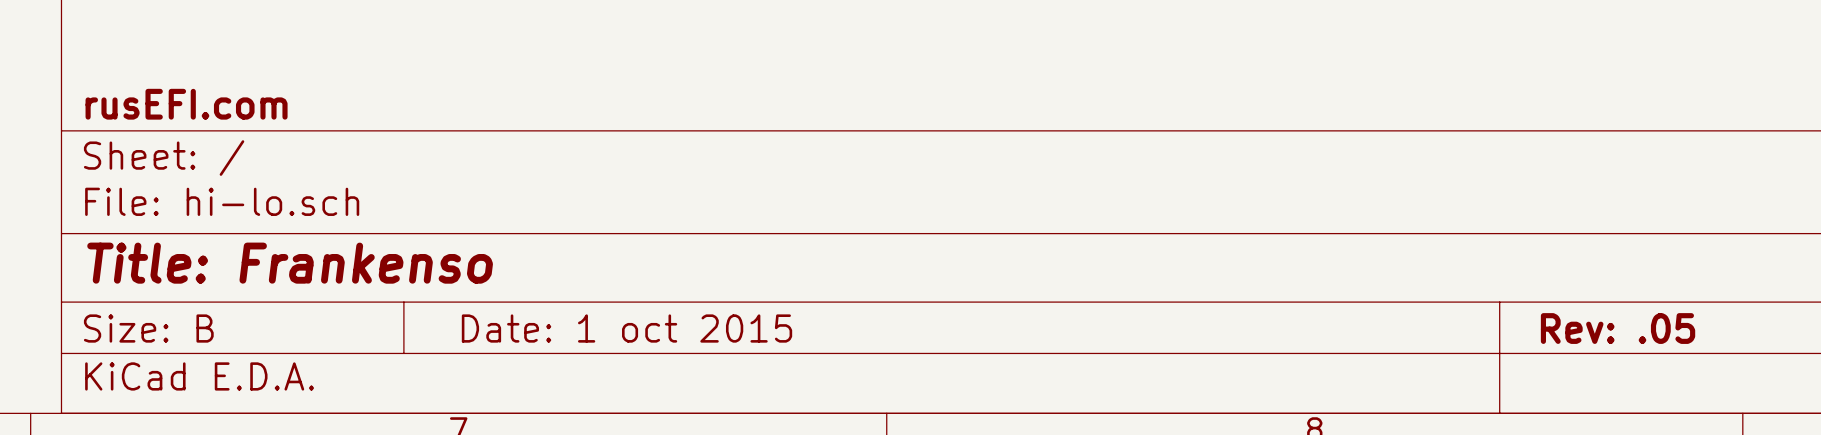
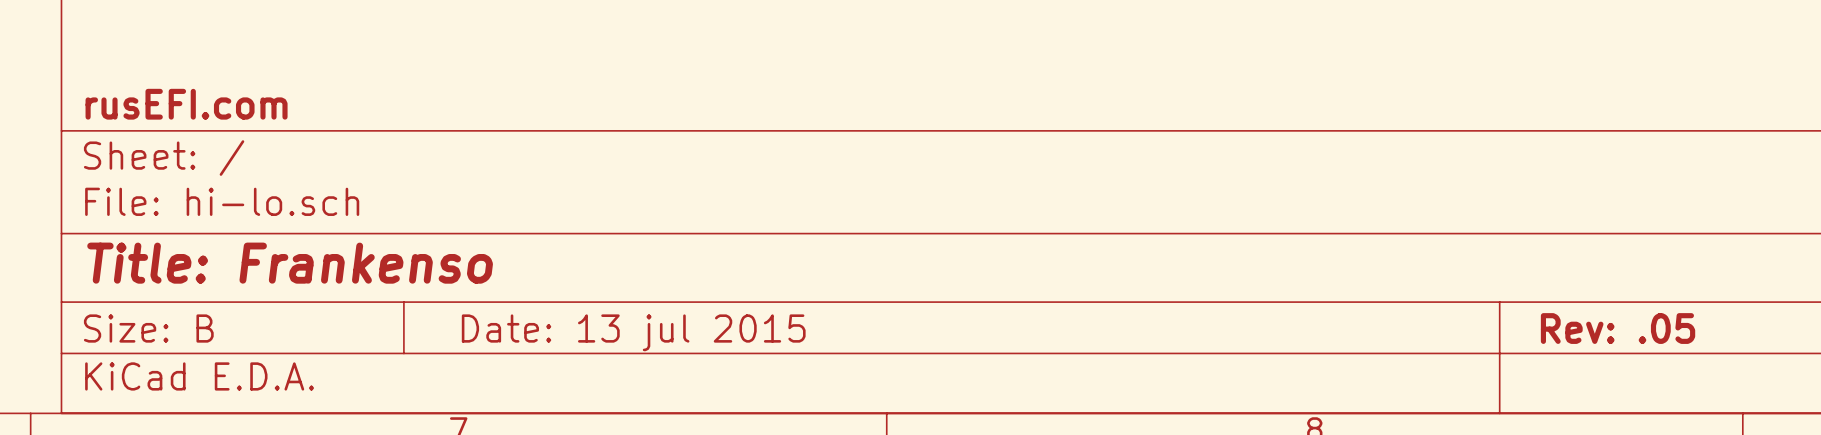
title block: Date: 1 oct 2015 (626, 328) -> Date: 13 jul 2015 (633, 332)

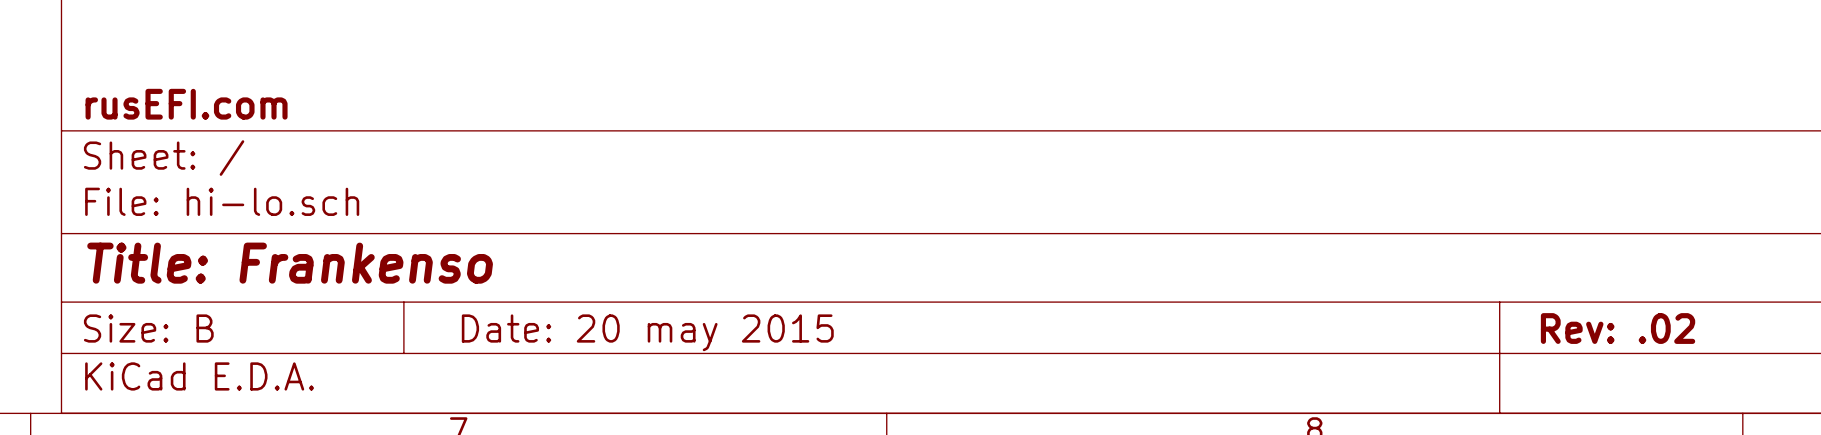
title block: Rev: .05 (1618, 328) -> Rev: .02 (1618, 328)
title block: Date: 13 jul 2015 (633, 332) -> Date: 20 may 2015 (647, 332)

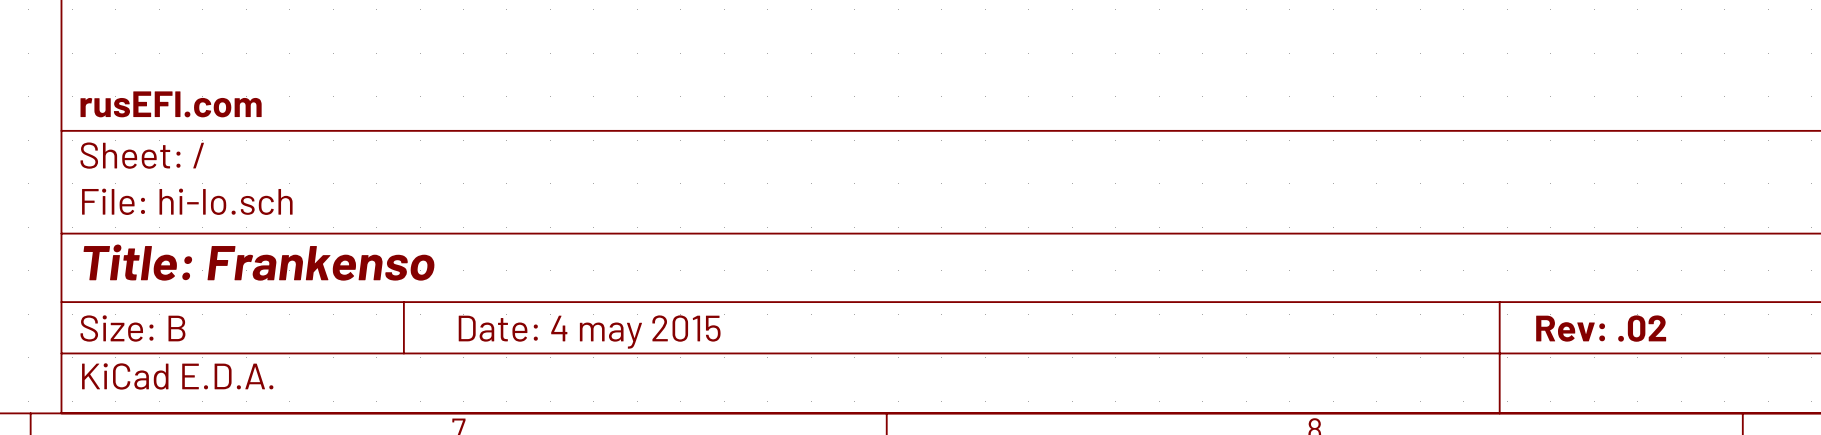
title block: Date: 20 may 2015 (647, 332) -> Date: 4 may 2015 (589, 332)

